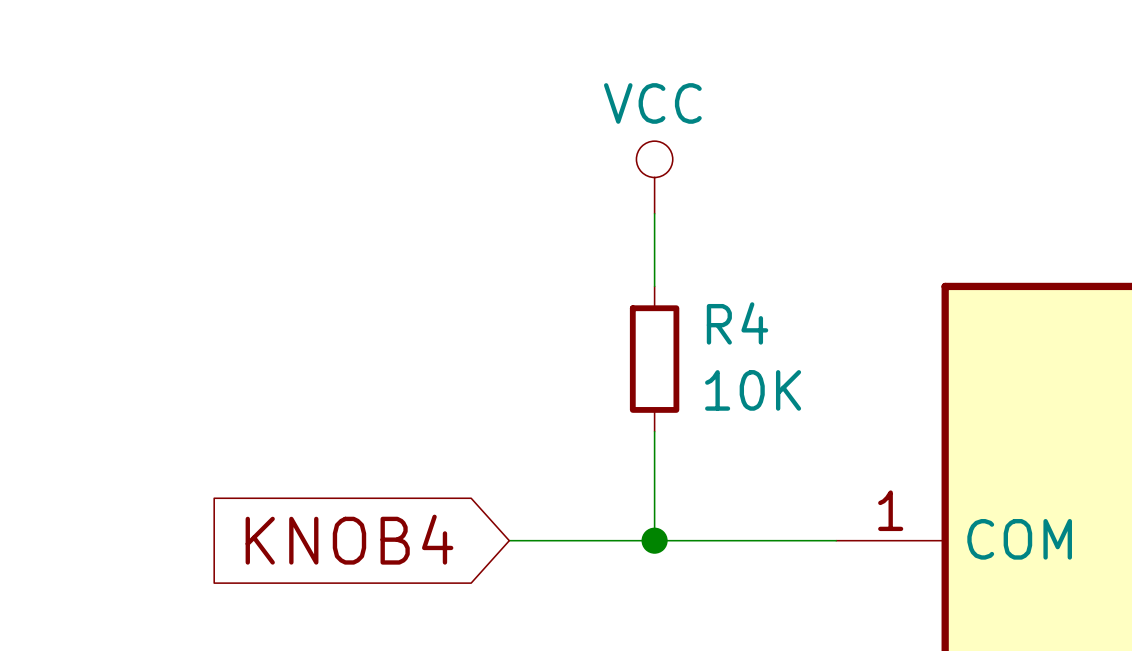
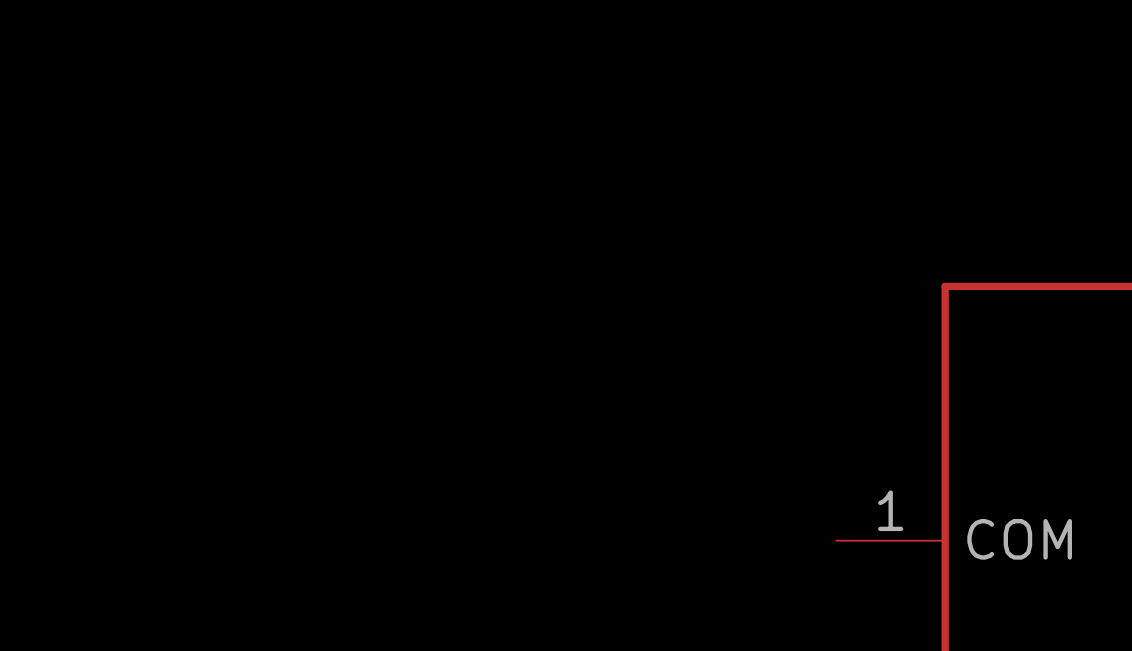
power symbol: VCC (654, 177) -> none
wire: (654, 213) (654, 286) -> none
R4: 10K (654, 359) -> none
wire: (654, 431) (654, 540) -> none
global label: KNOB4 (349, 539) -> none
wire: (509, 540) (836, 540) -> none
junction: (654, 540) -> none

